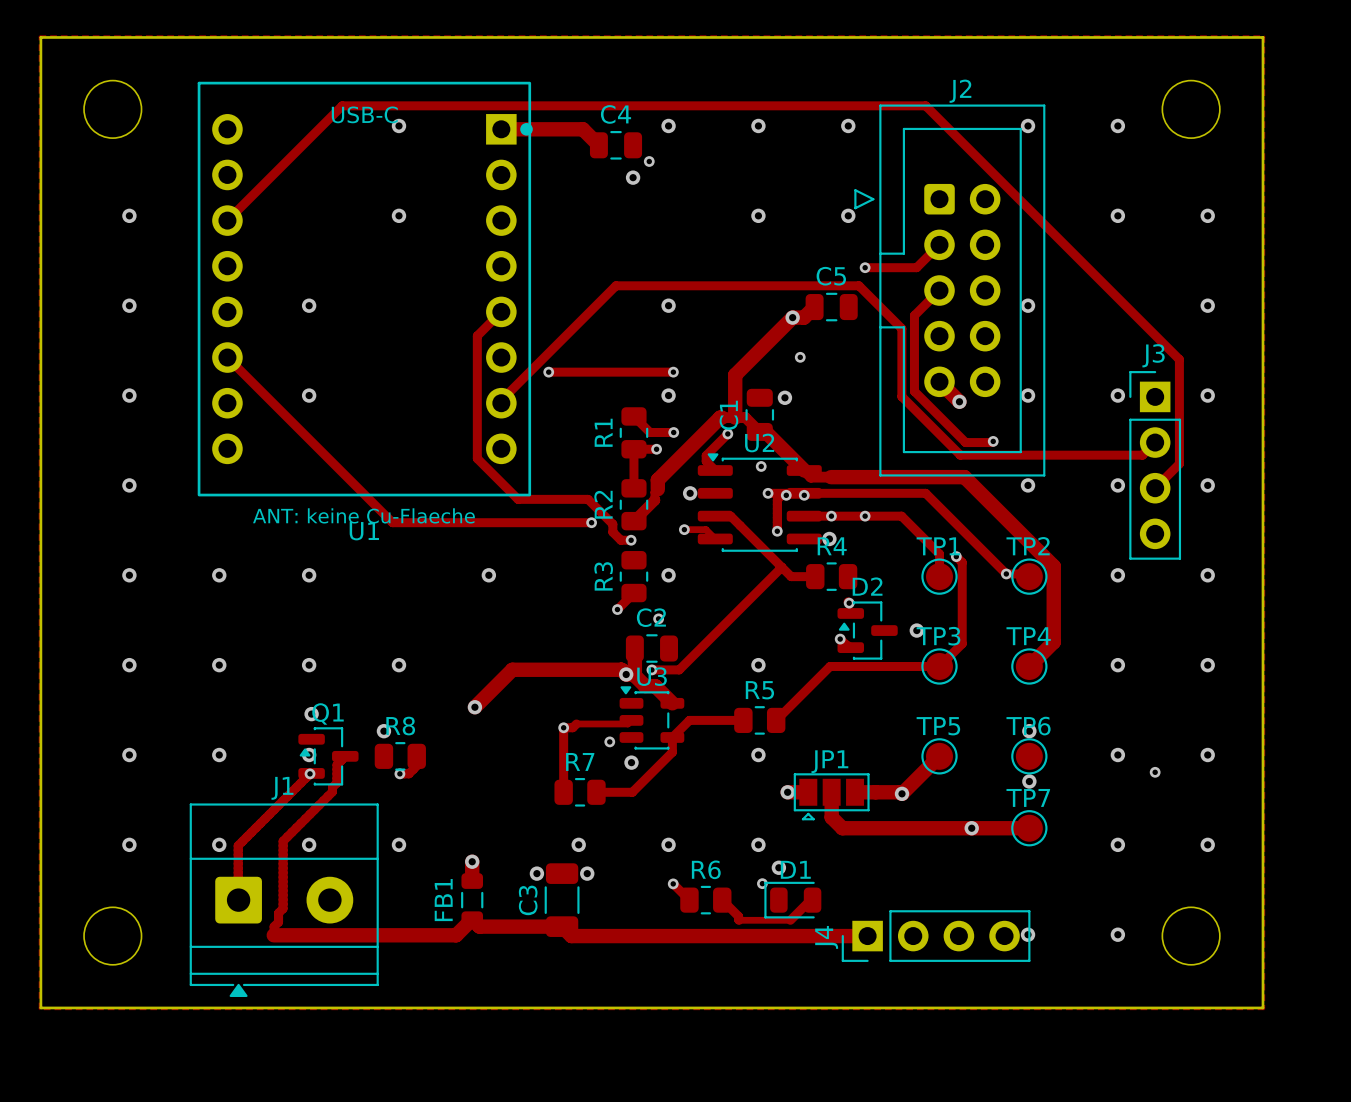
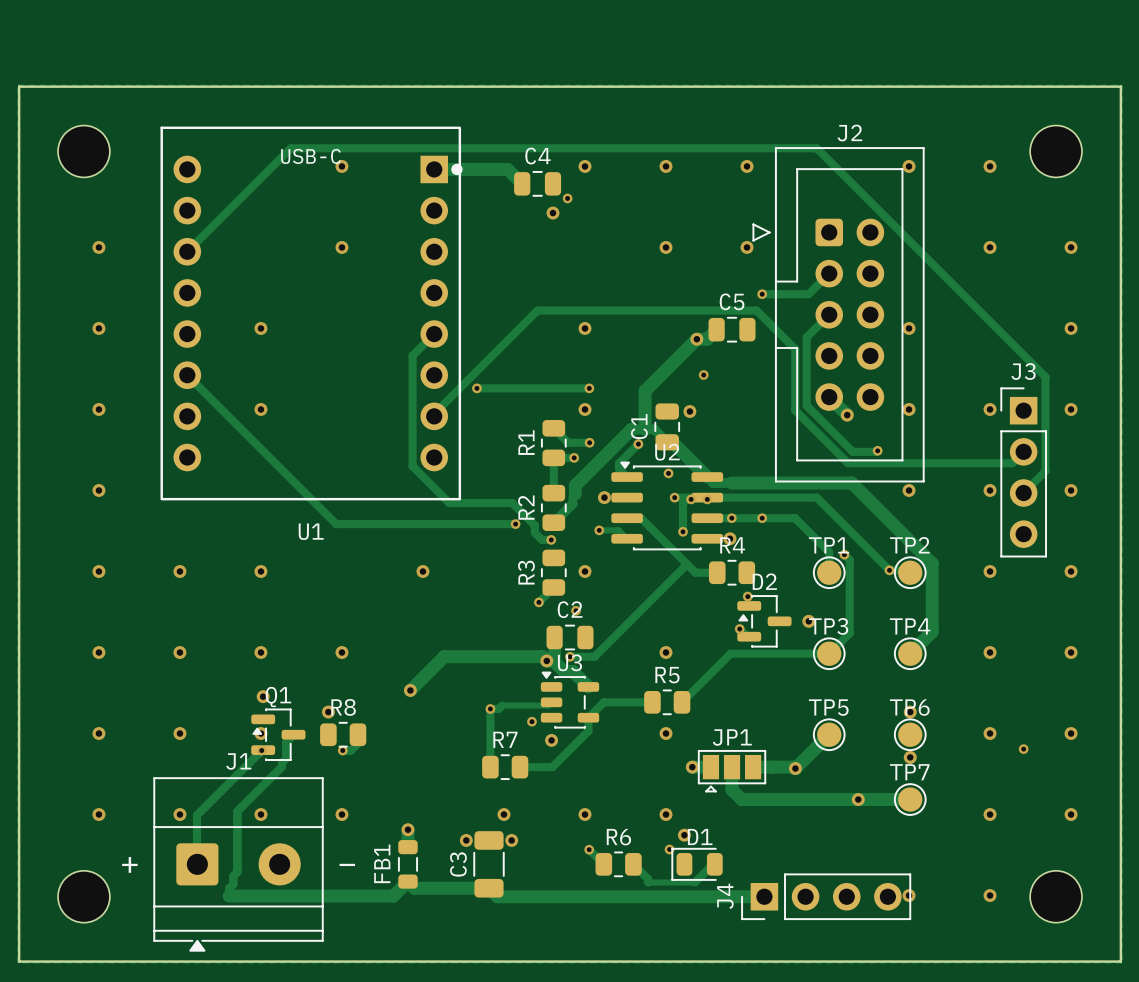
U1 text: ANT: keine Cu-Flaeche (363, 515) -> none
text: none -> + (129, 864)
text: none -> − (347, 864)

